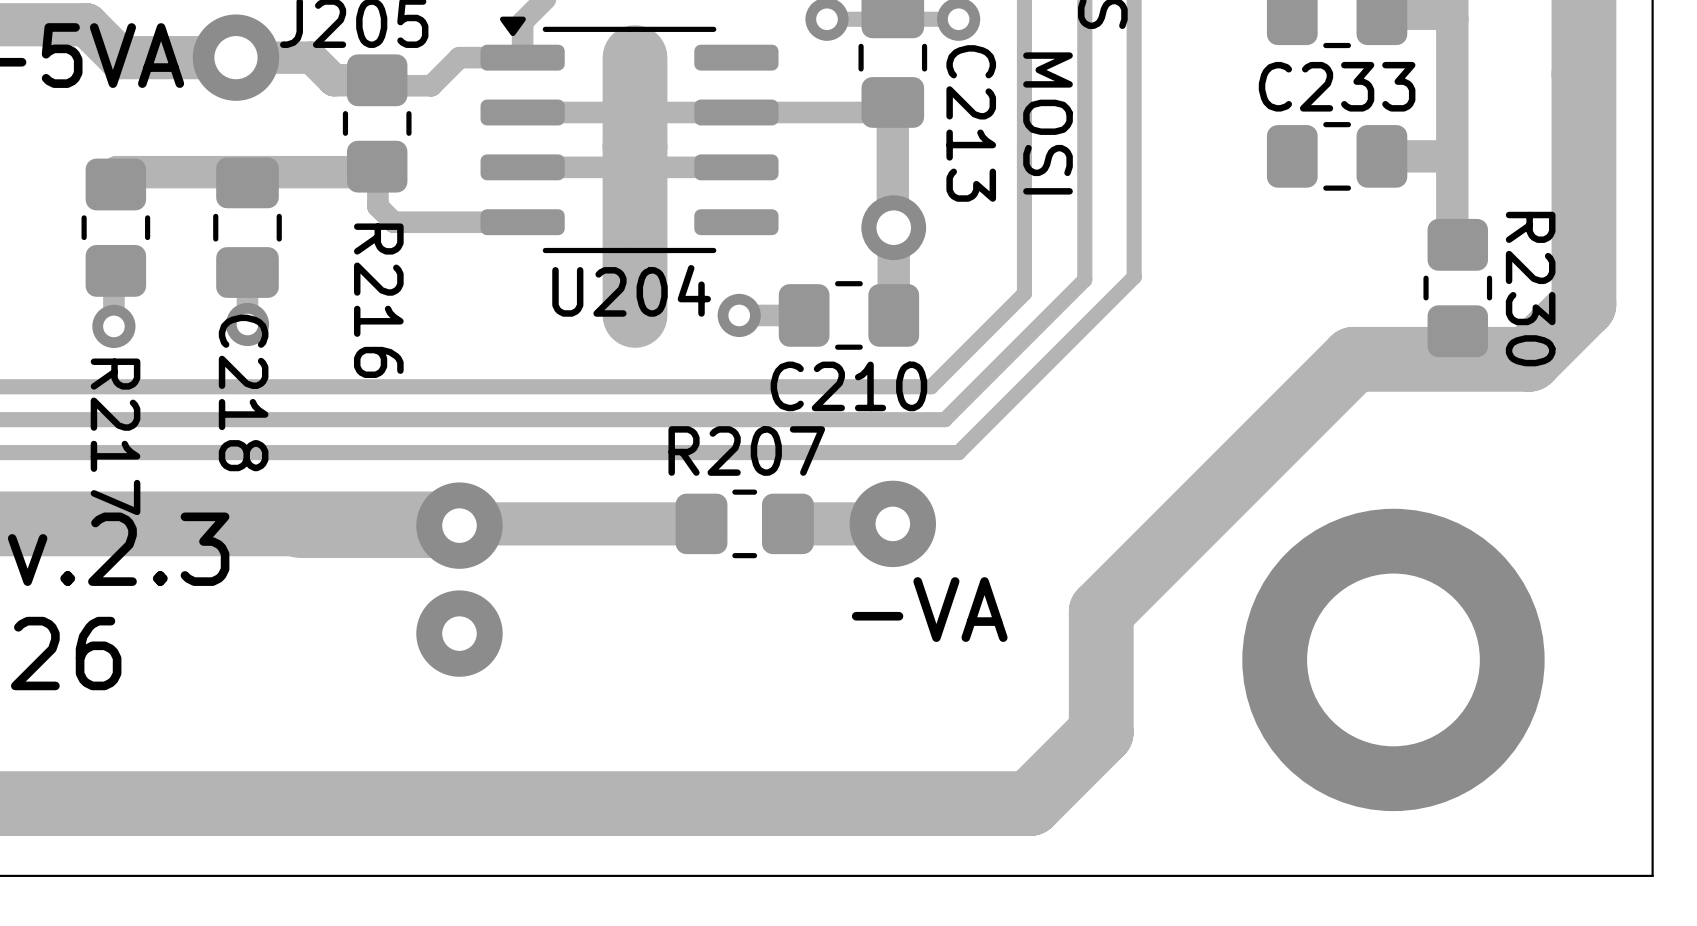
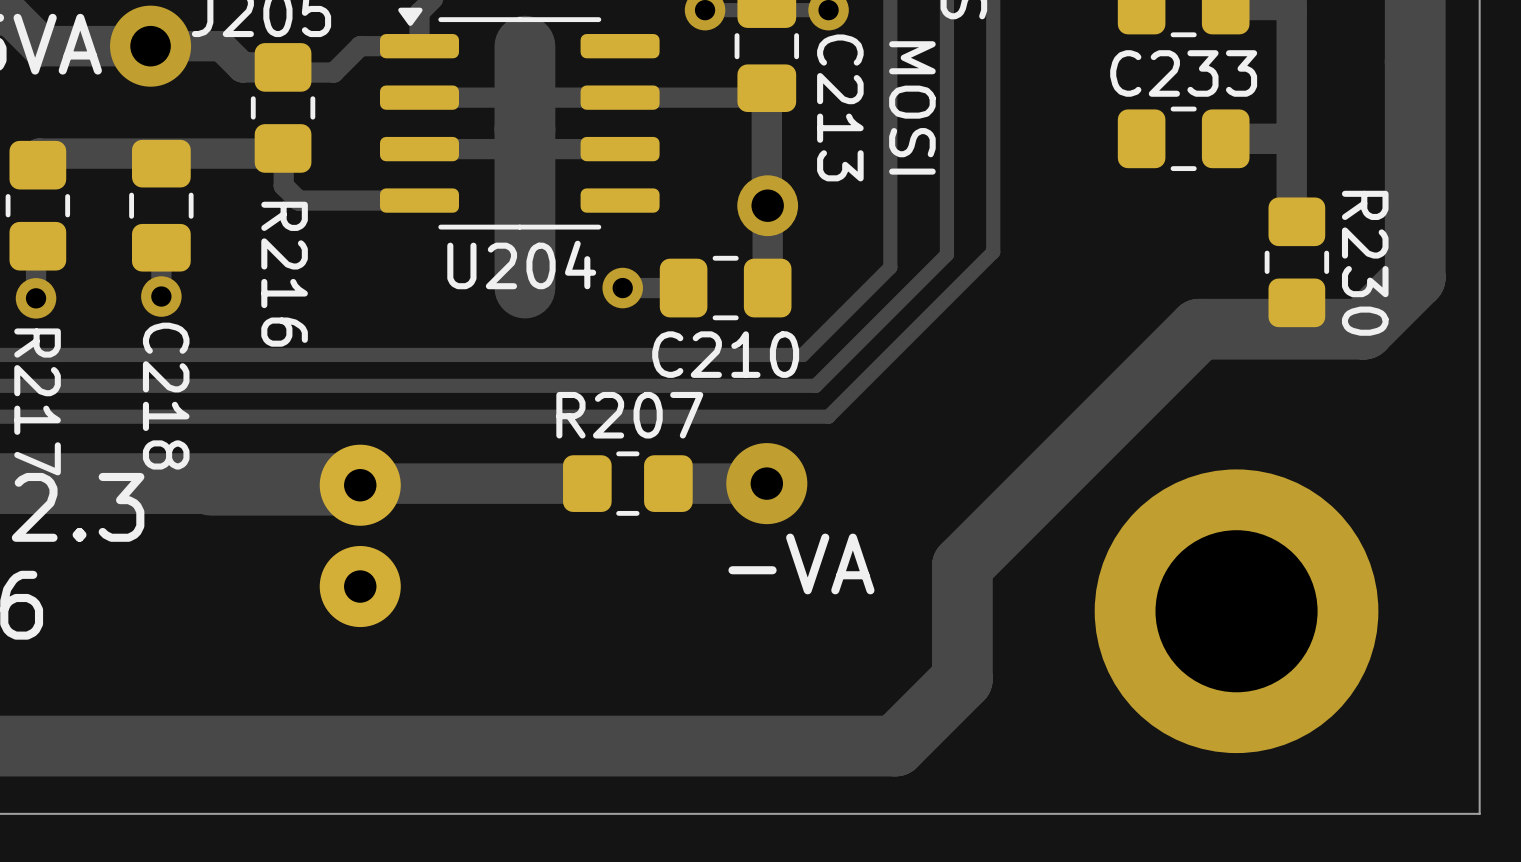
C218 name position: C218 (243, 392) -> C218 (166, 396)

